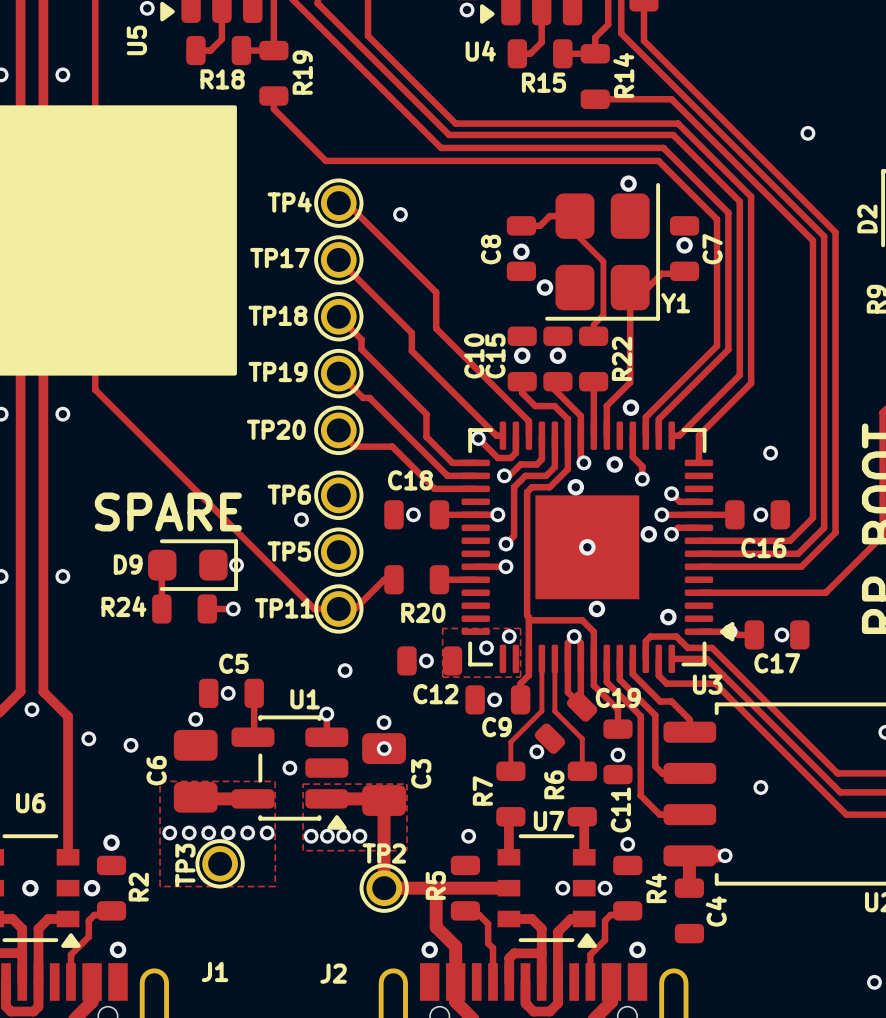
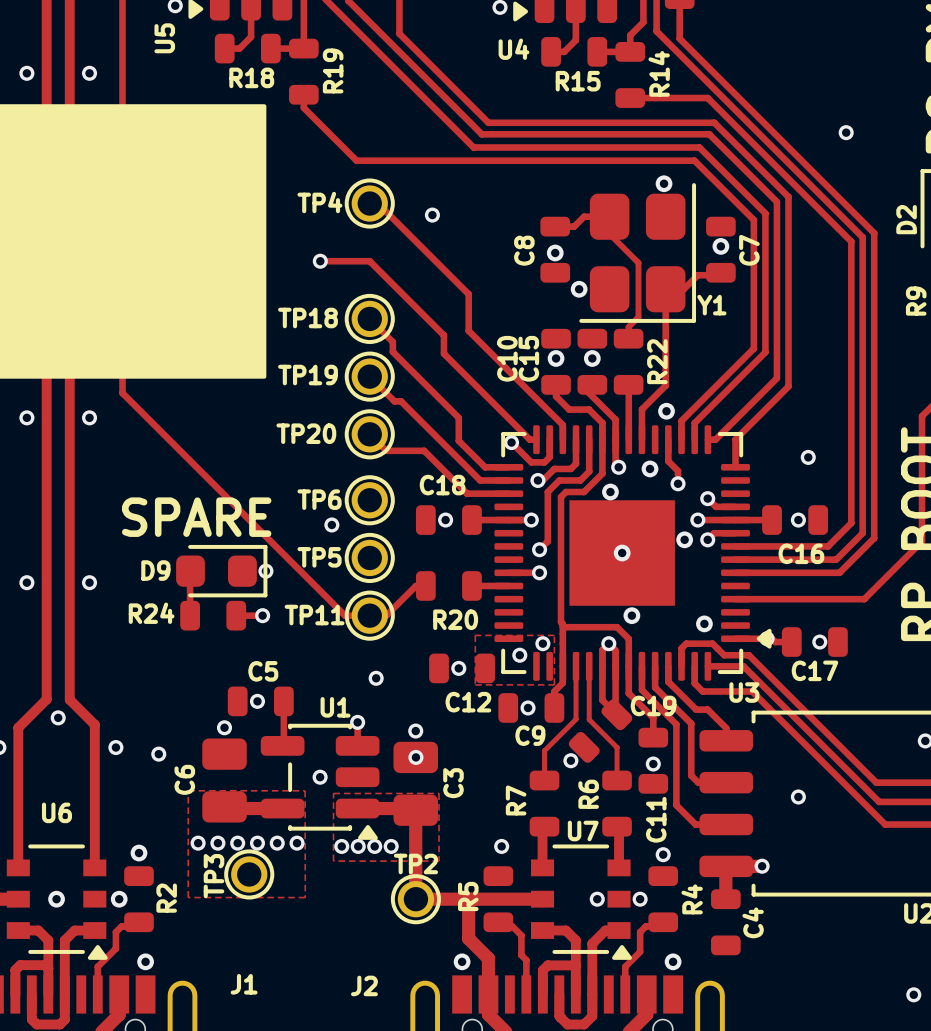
track: none -> (320, 261) (369, 261)
via: none -> (320, 261)
TP17: (338, 259) -> none

